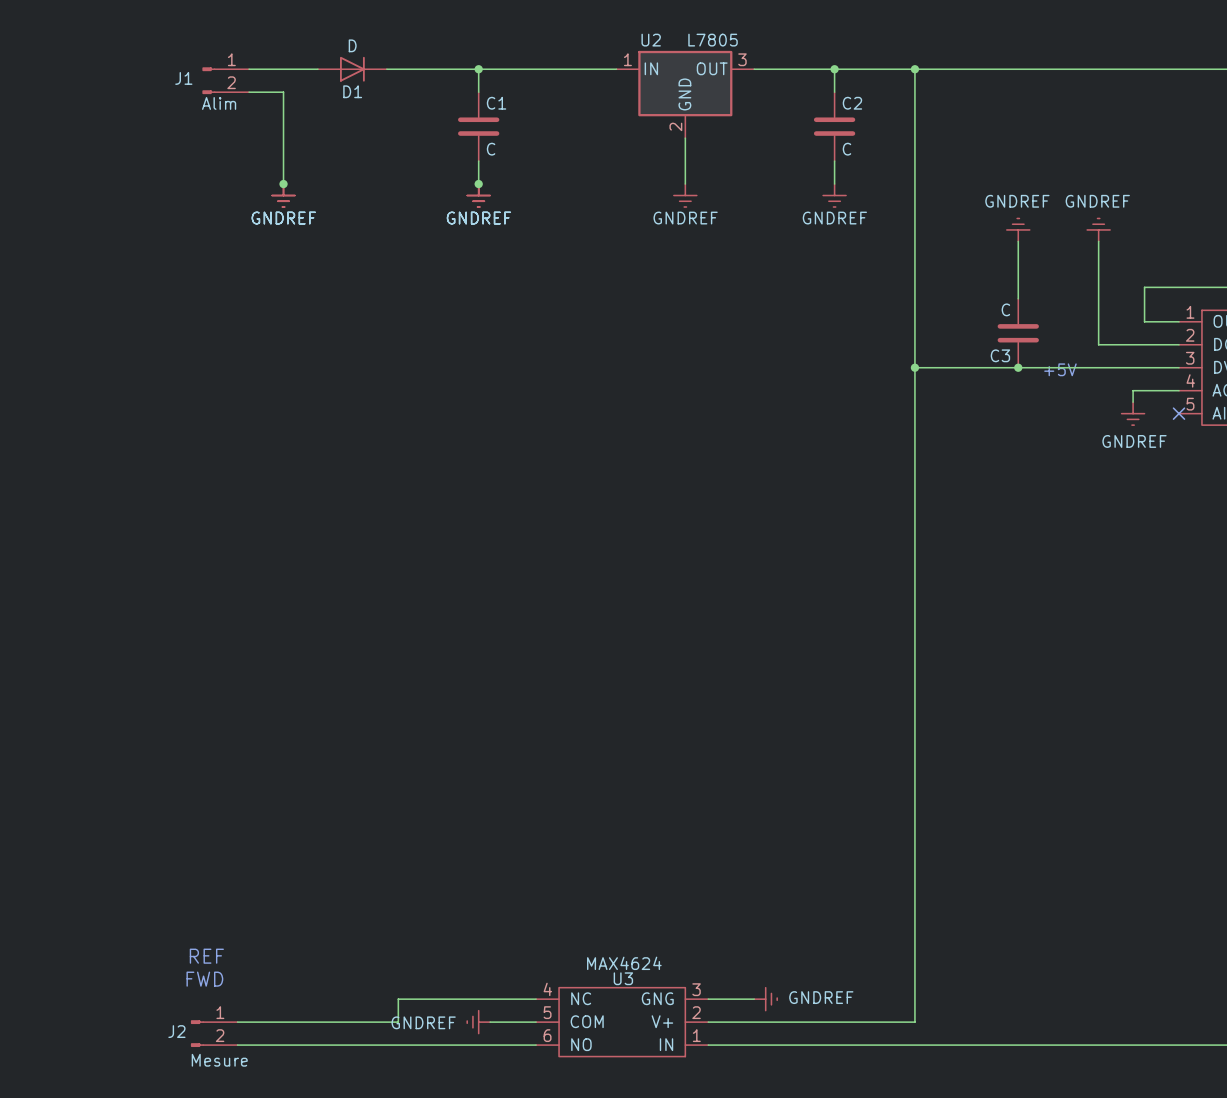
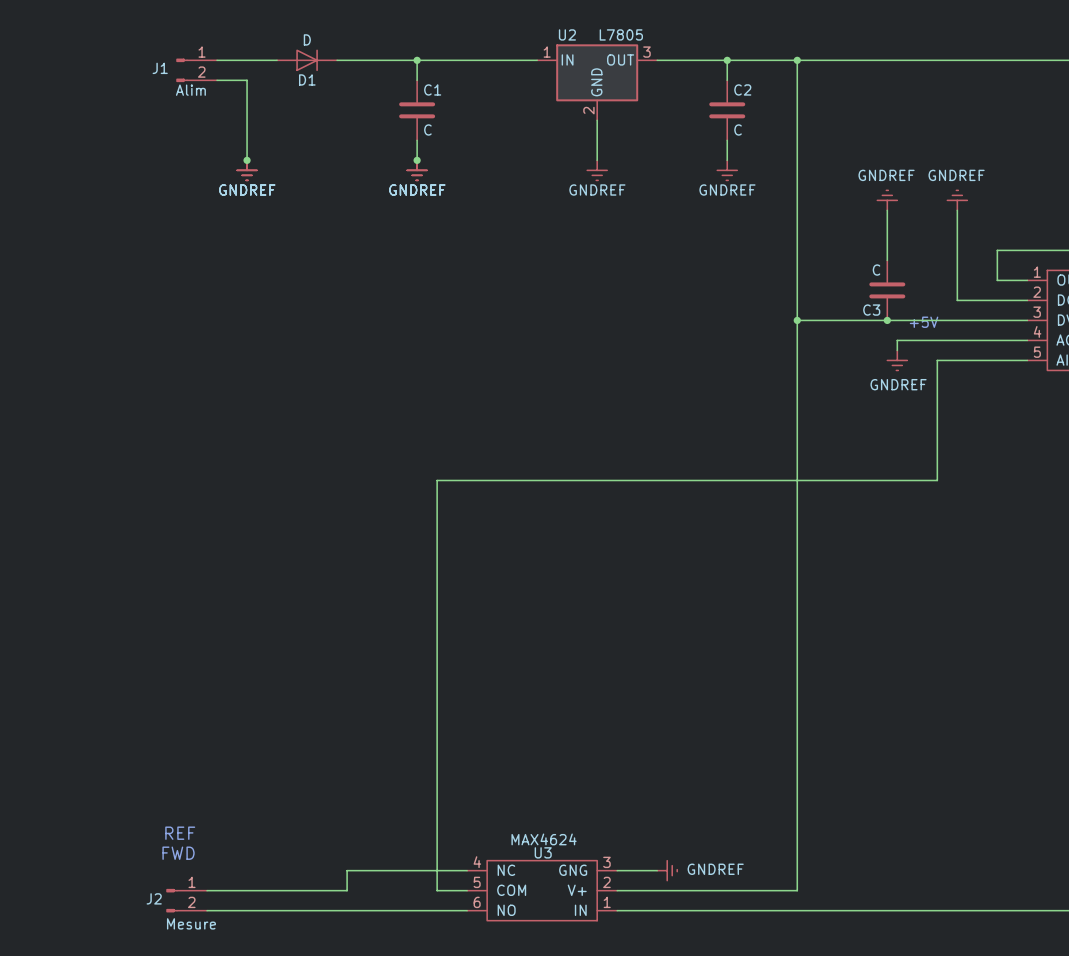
wire: (1133, 390) (1133, 402) -> (987, 340) (897, 340) (897, 350)
power symbol position: GNDREF (1133, 413) -> GNDREF (897, 360)
no-connect mark: (1179, 413) -> none
power symbol: GNDREF (478, 1022) -> none
wire: (490, 1022) (501, 1022) -> (1027, 360) (937, 360) (937, 480) (437, 480) (437, 890)

